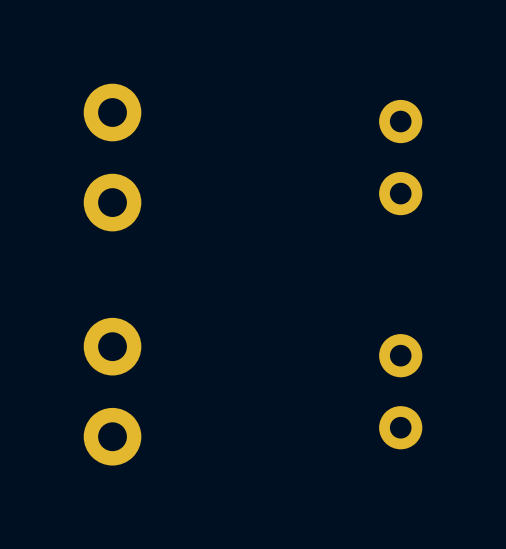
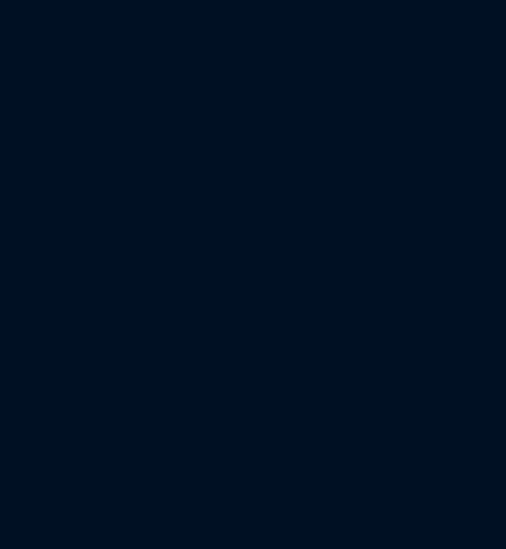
part: (112, 157) -> none
part: (400, 157) -> none
part: (112, 391) -> none
part: (400, 391) -> none

